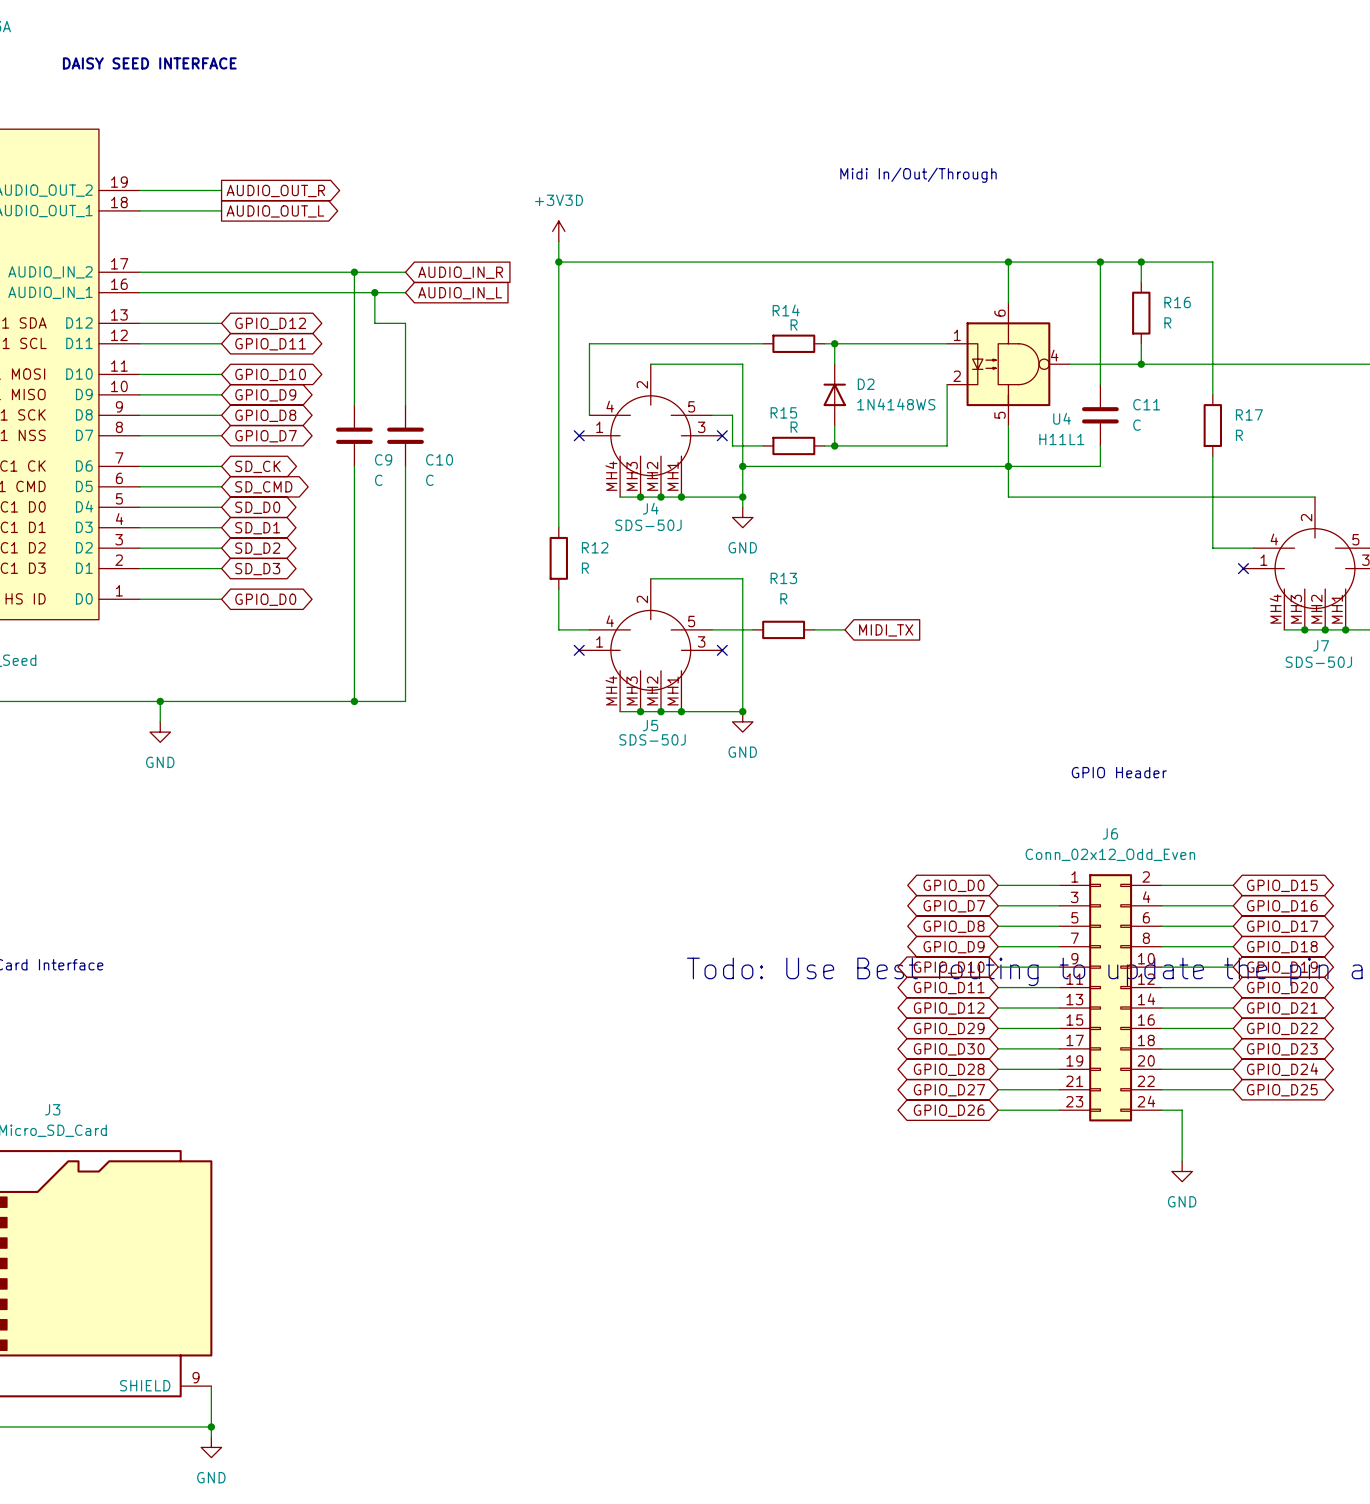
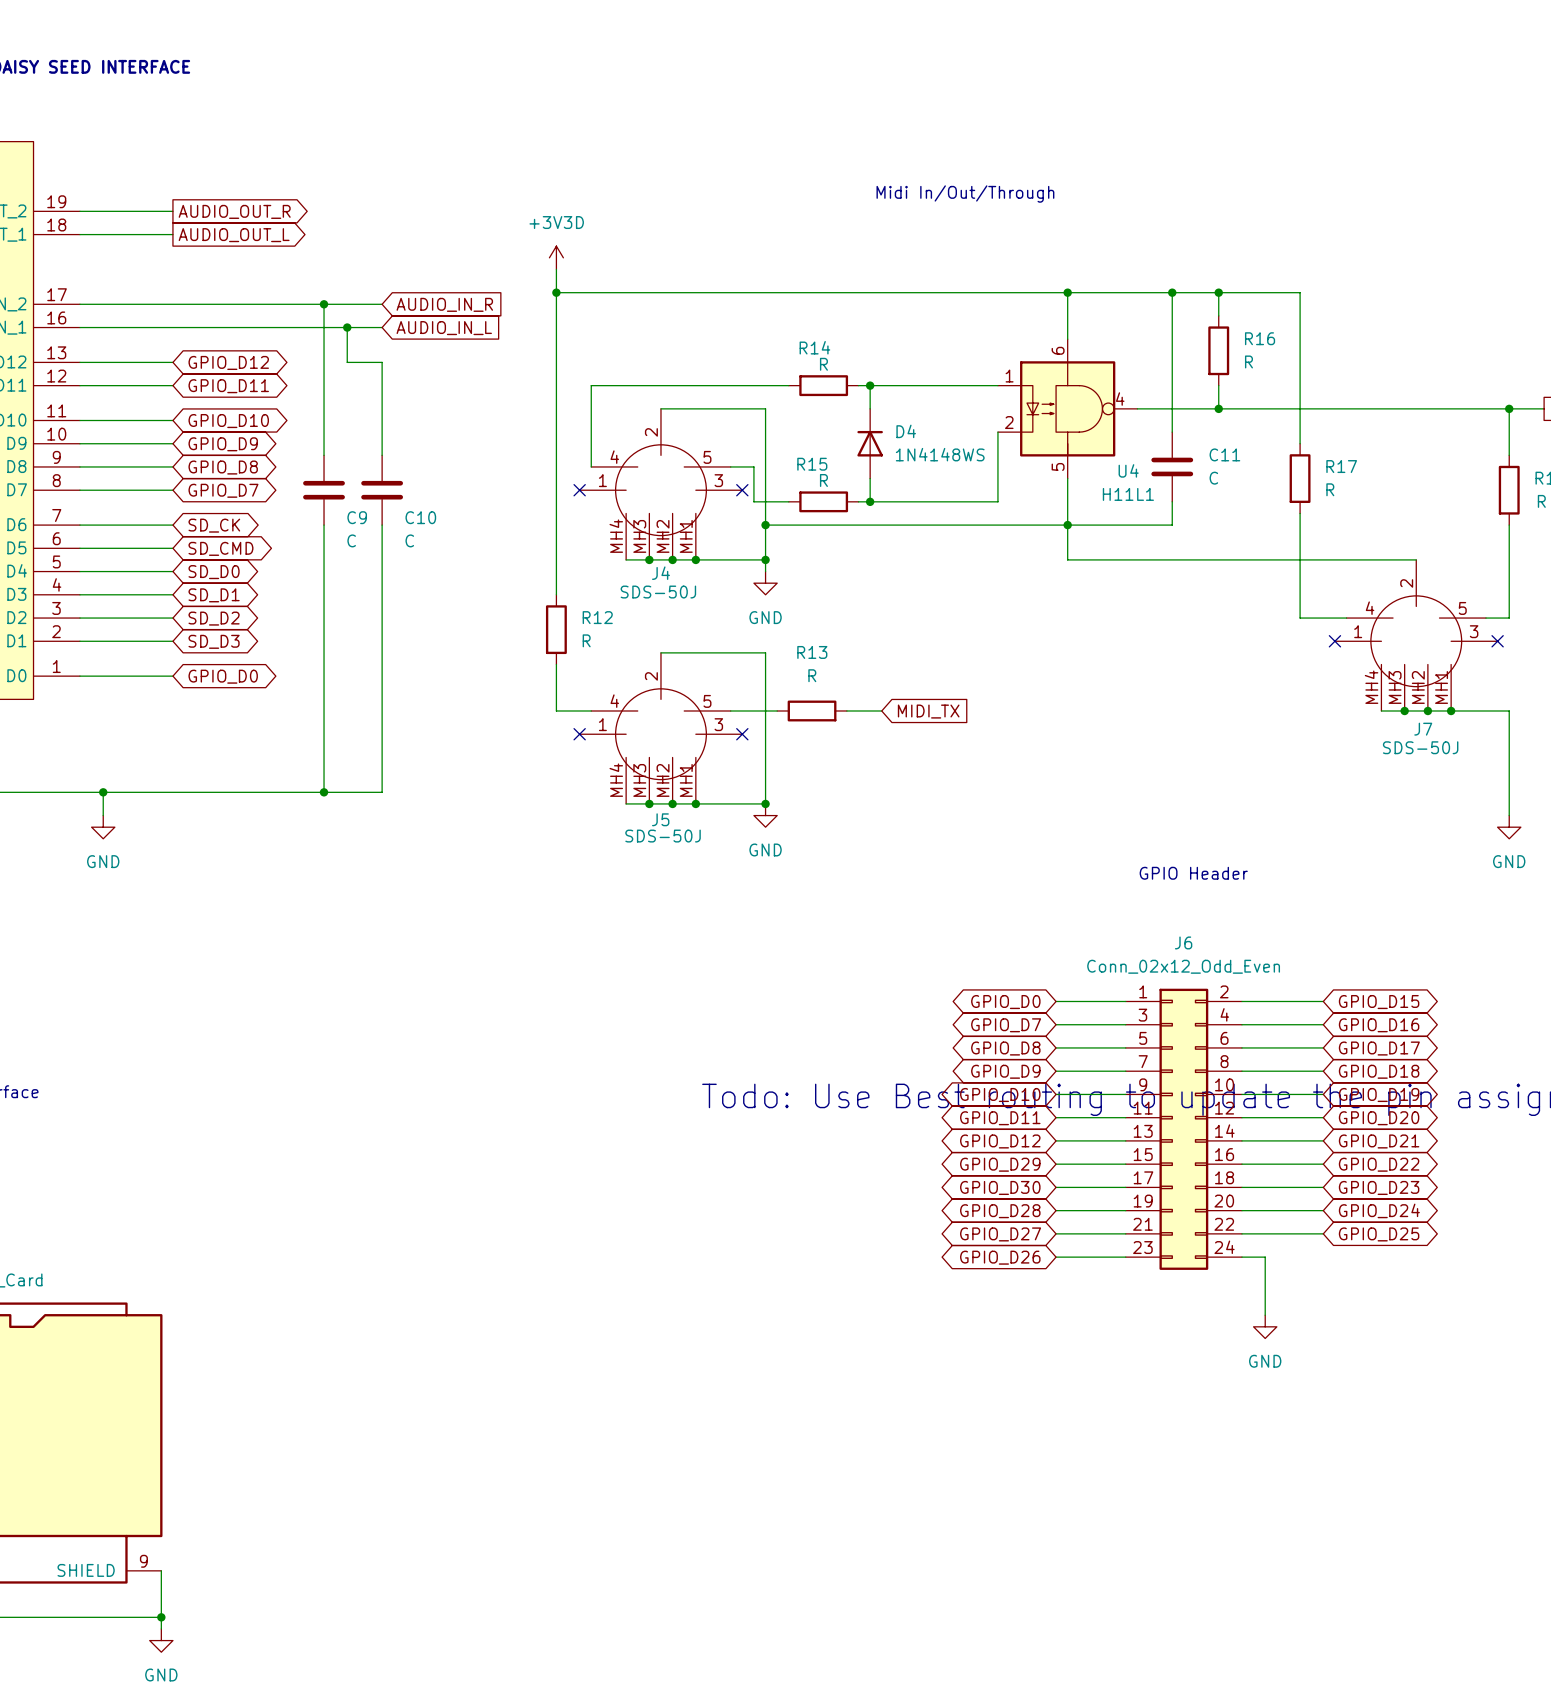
D2 name: D2 (866, 384) -> D4 (906, 431)

